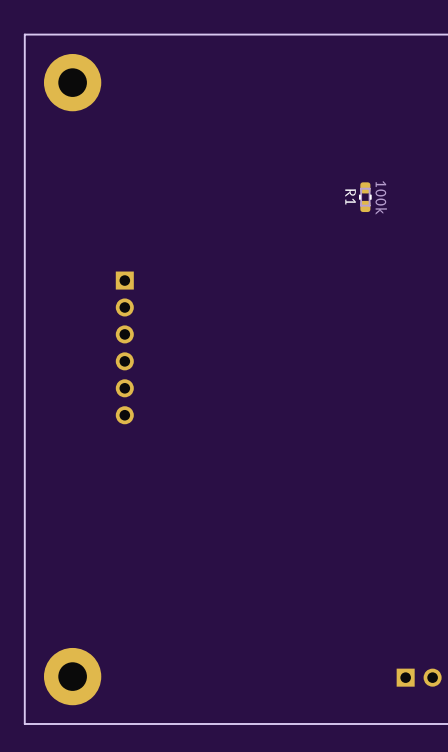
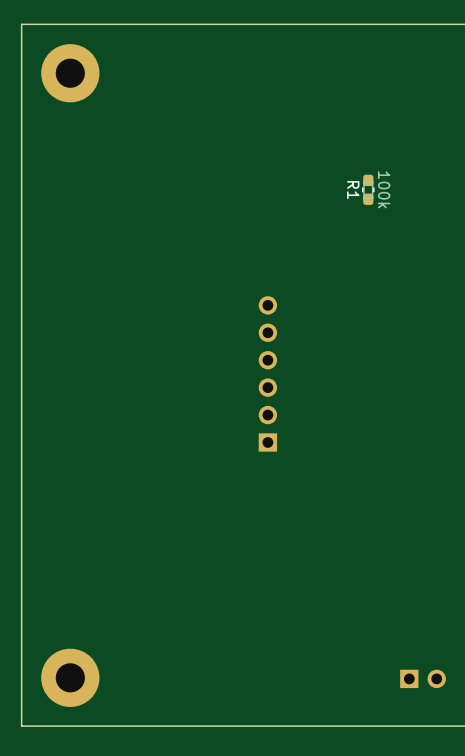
part rotation: 0° (124, 347) -> 180° (267, 373)
part position: (124, 347) -> (267, 373)

